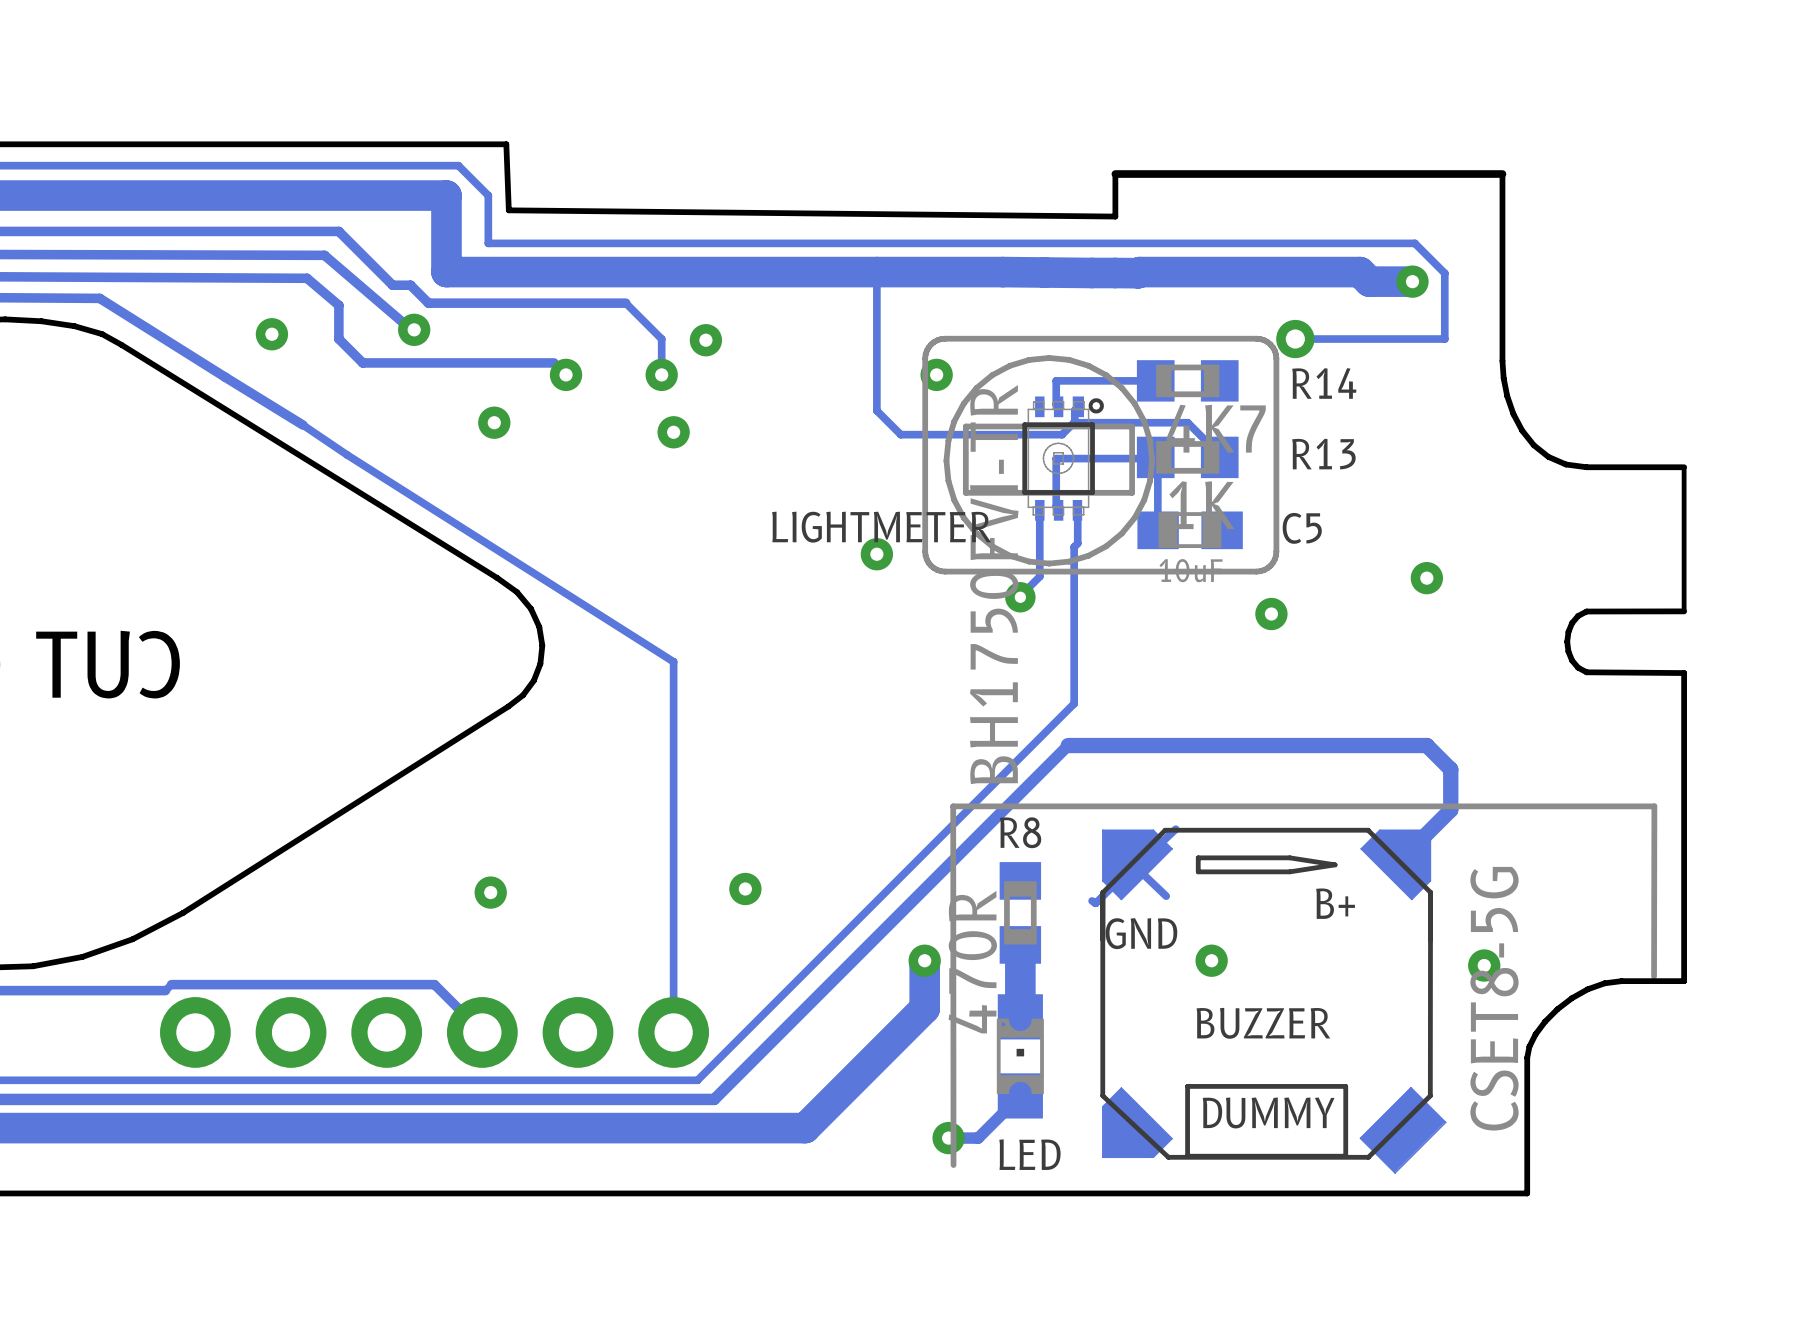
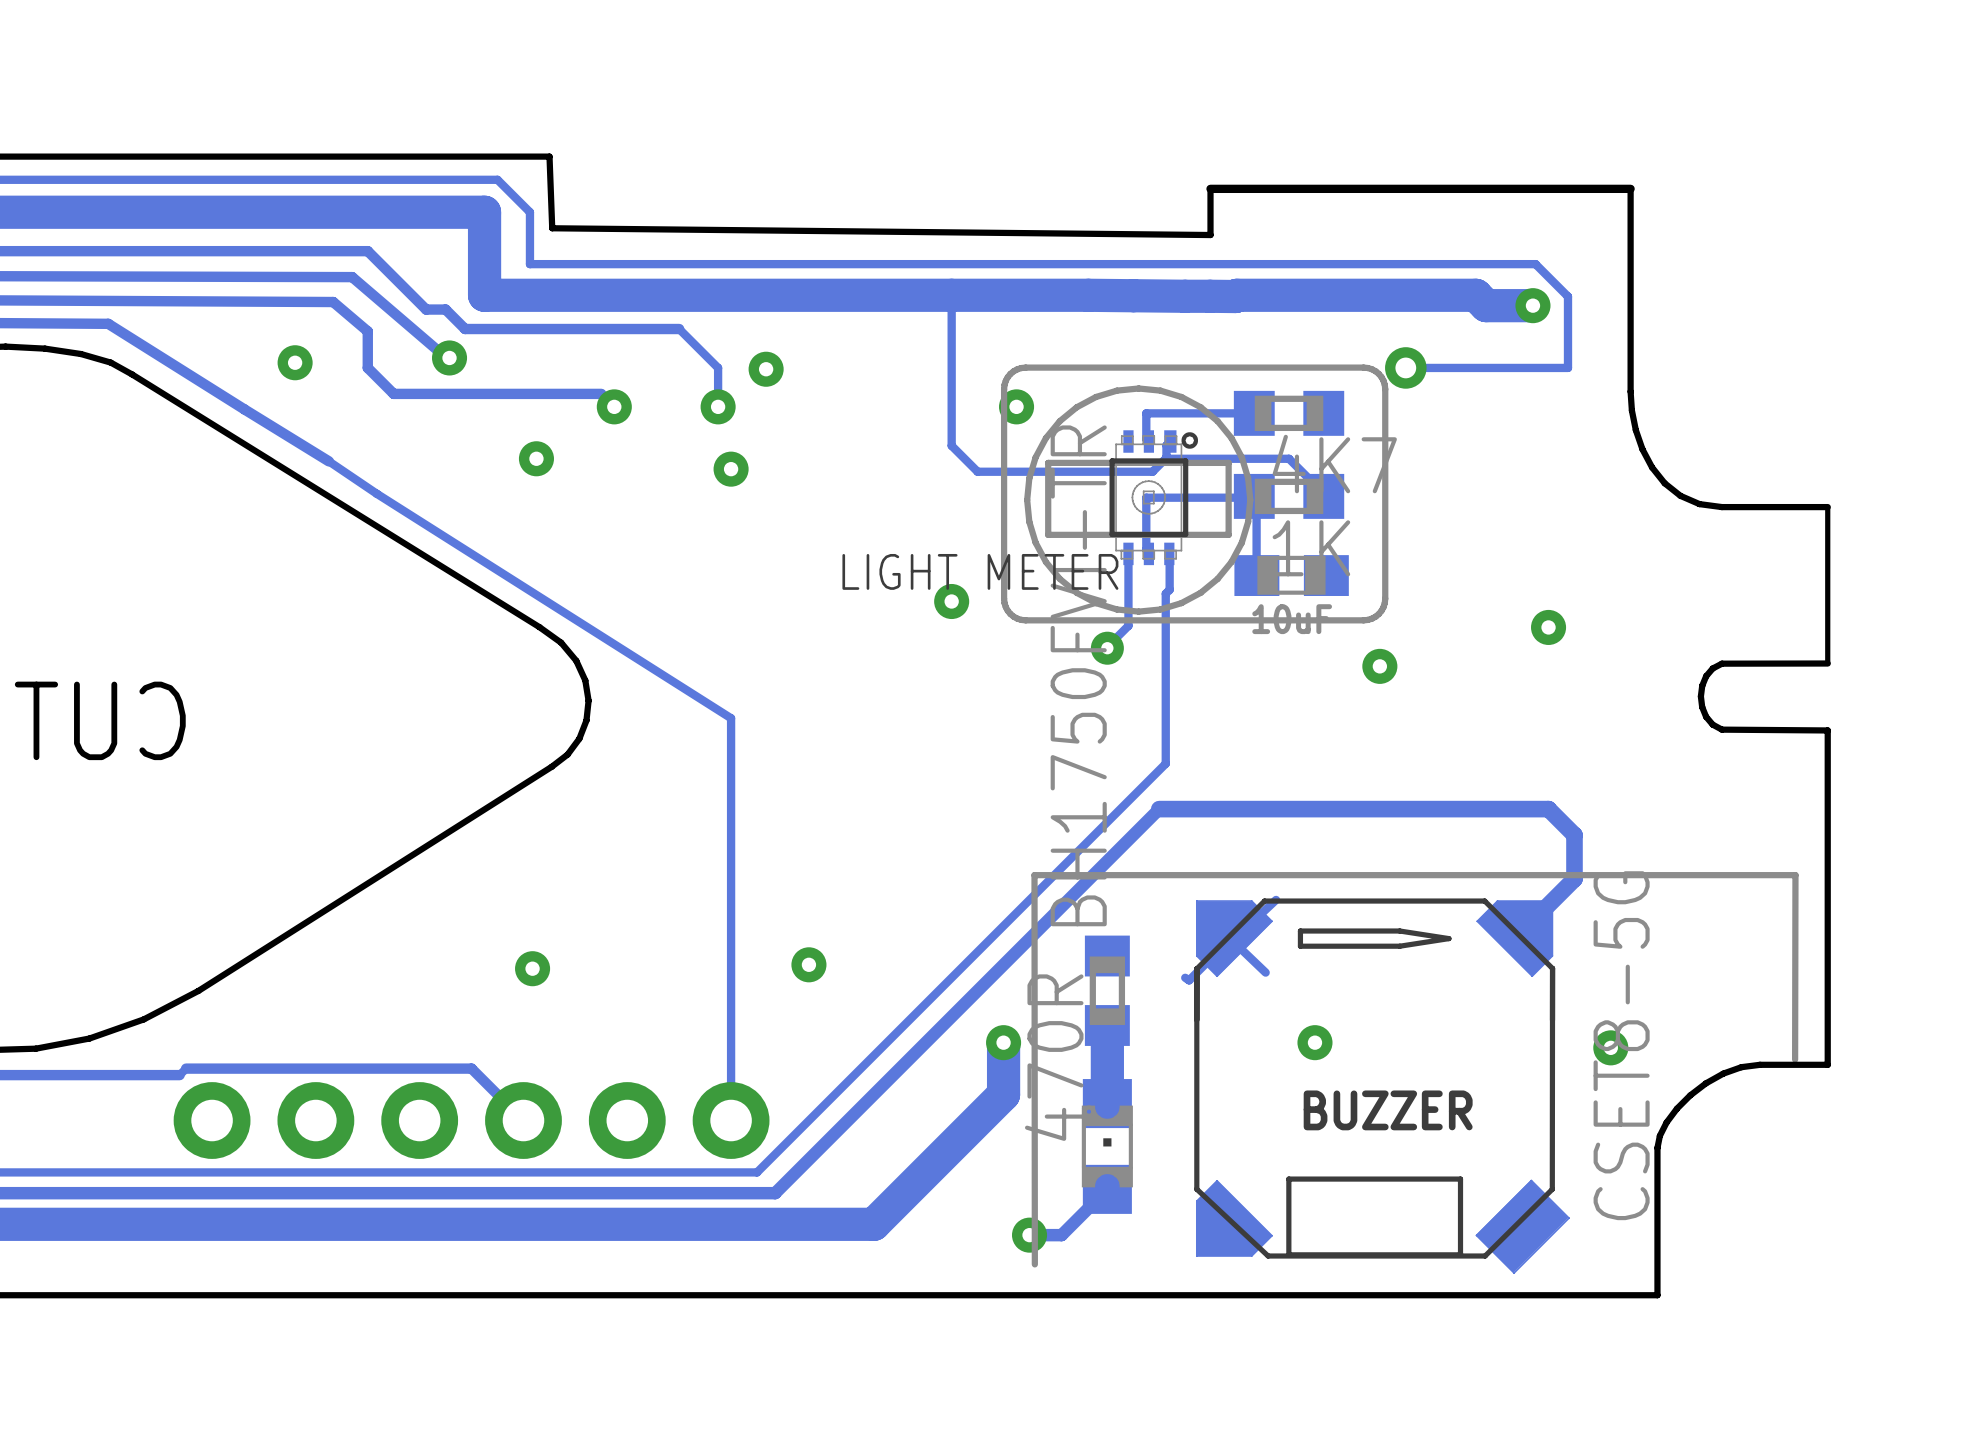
R14 name: R14 (1324, 383) -> none
R13 name: R13 (1323, 454) -> none
text: LIGHTMETER (881, 527) -> LIGHT METER (980, 571)
C5 name: C5 (1302, 528) -> none
R8 name: R8 (1020, 832) -> none
text: B+ (1335, 903) -> none
text: GND (1141, 933) -> none
text: DUMMY (1268, 1112) -> none
text: LED (1029, 1154) -> none

